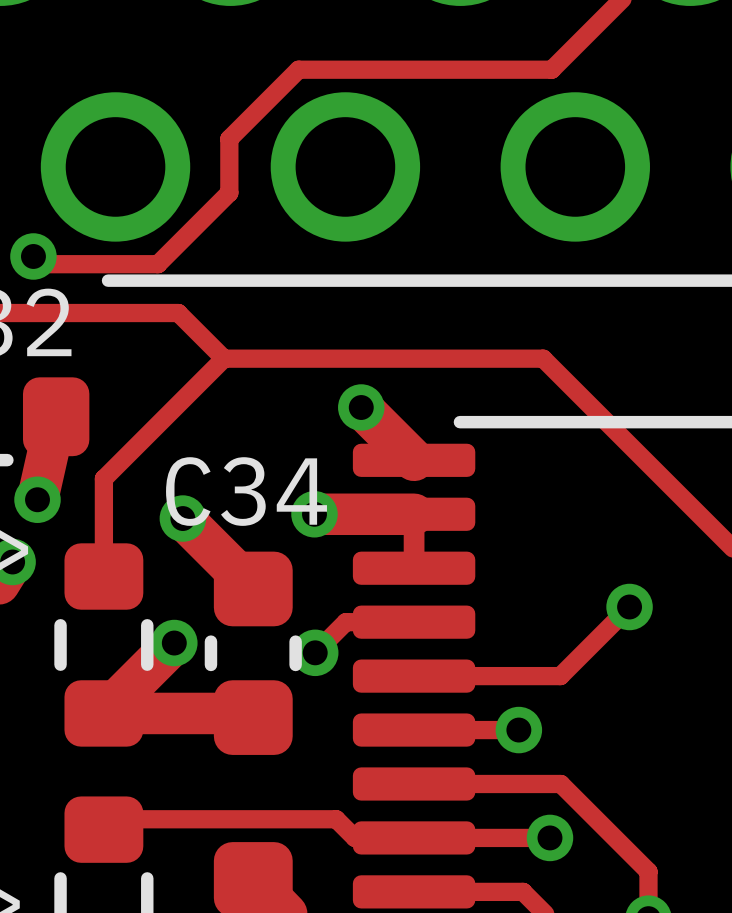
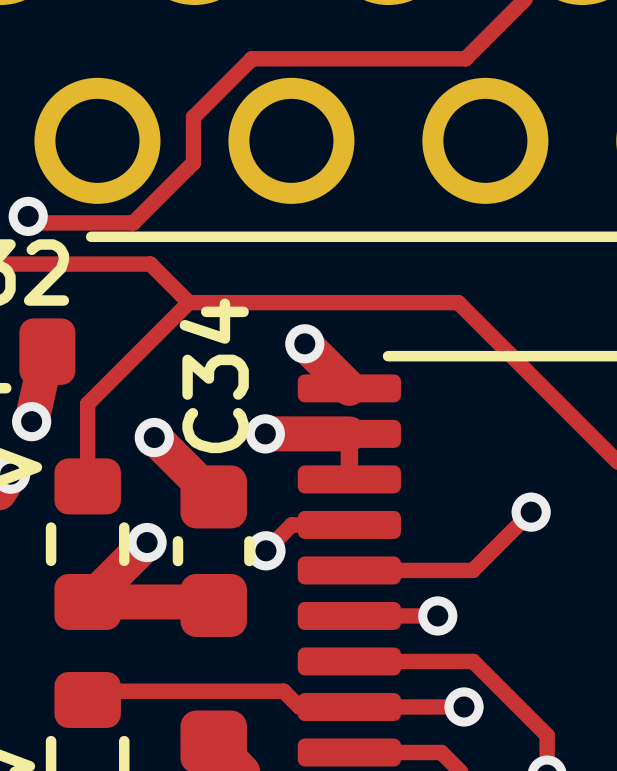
C34 name rotation: 0° (246, 491) -> 90° counterclockwise (214, 375)

